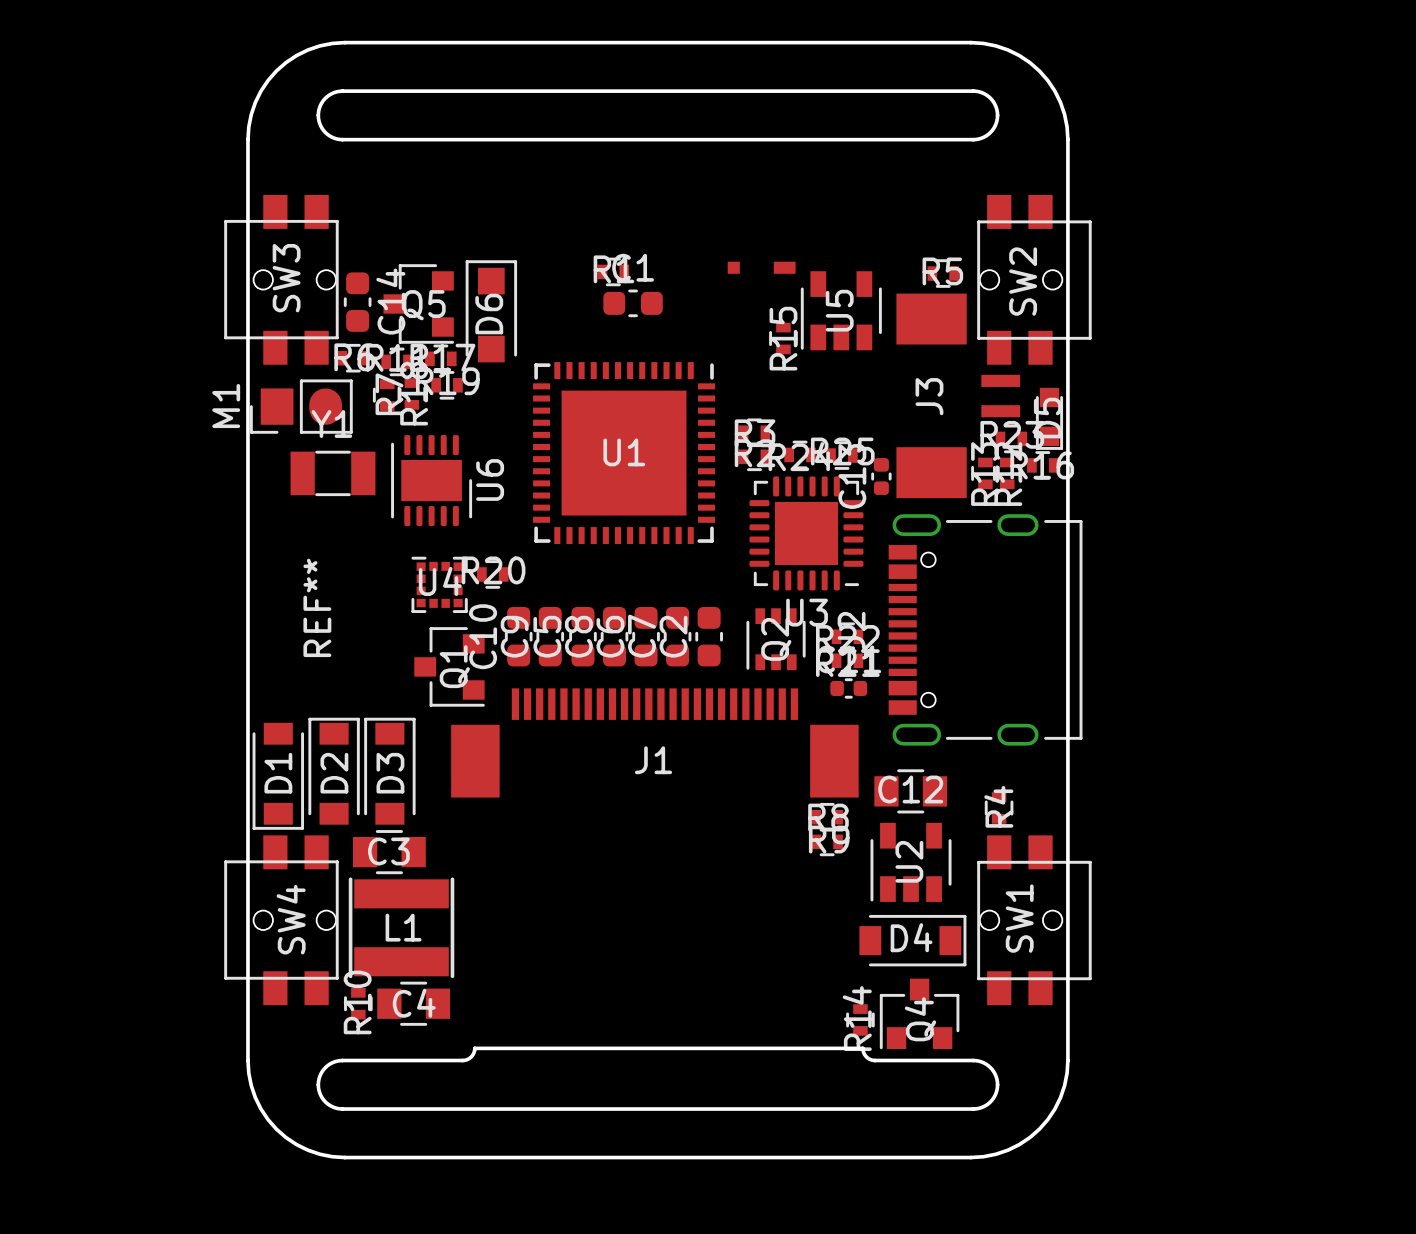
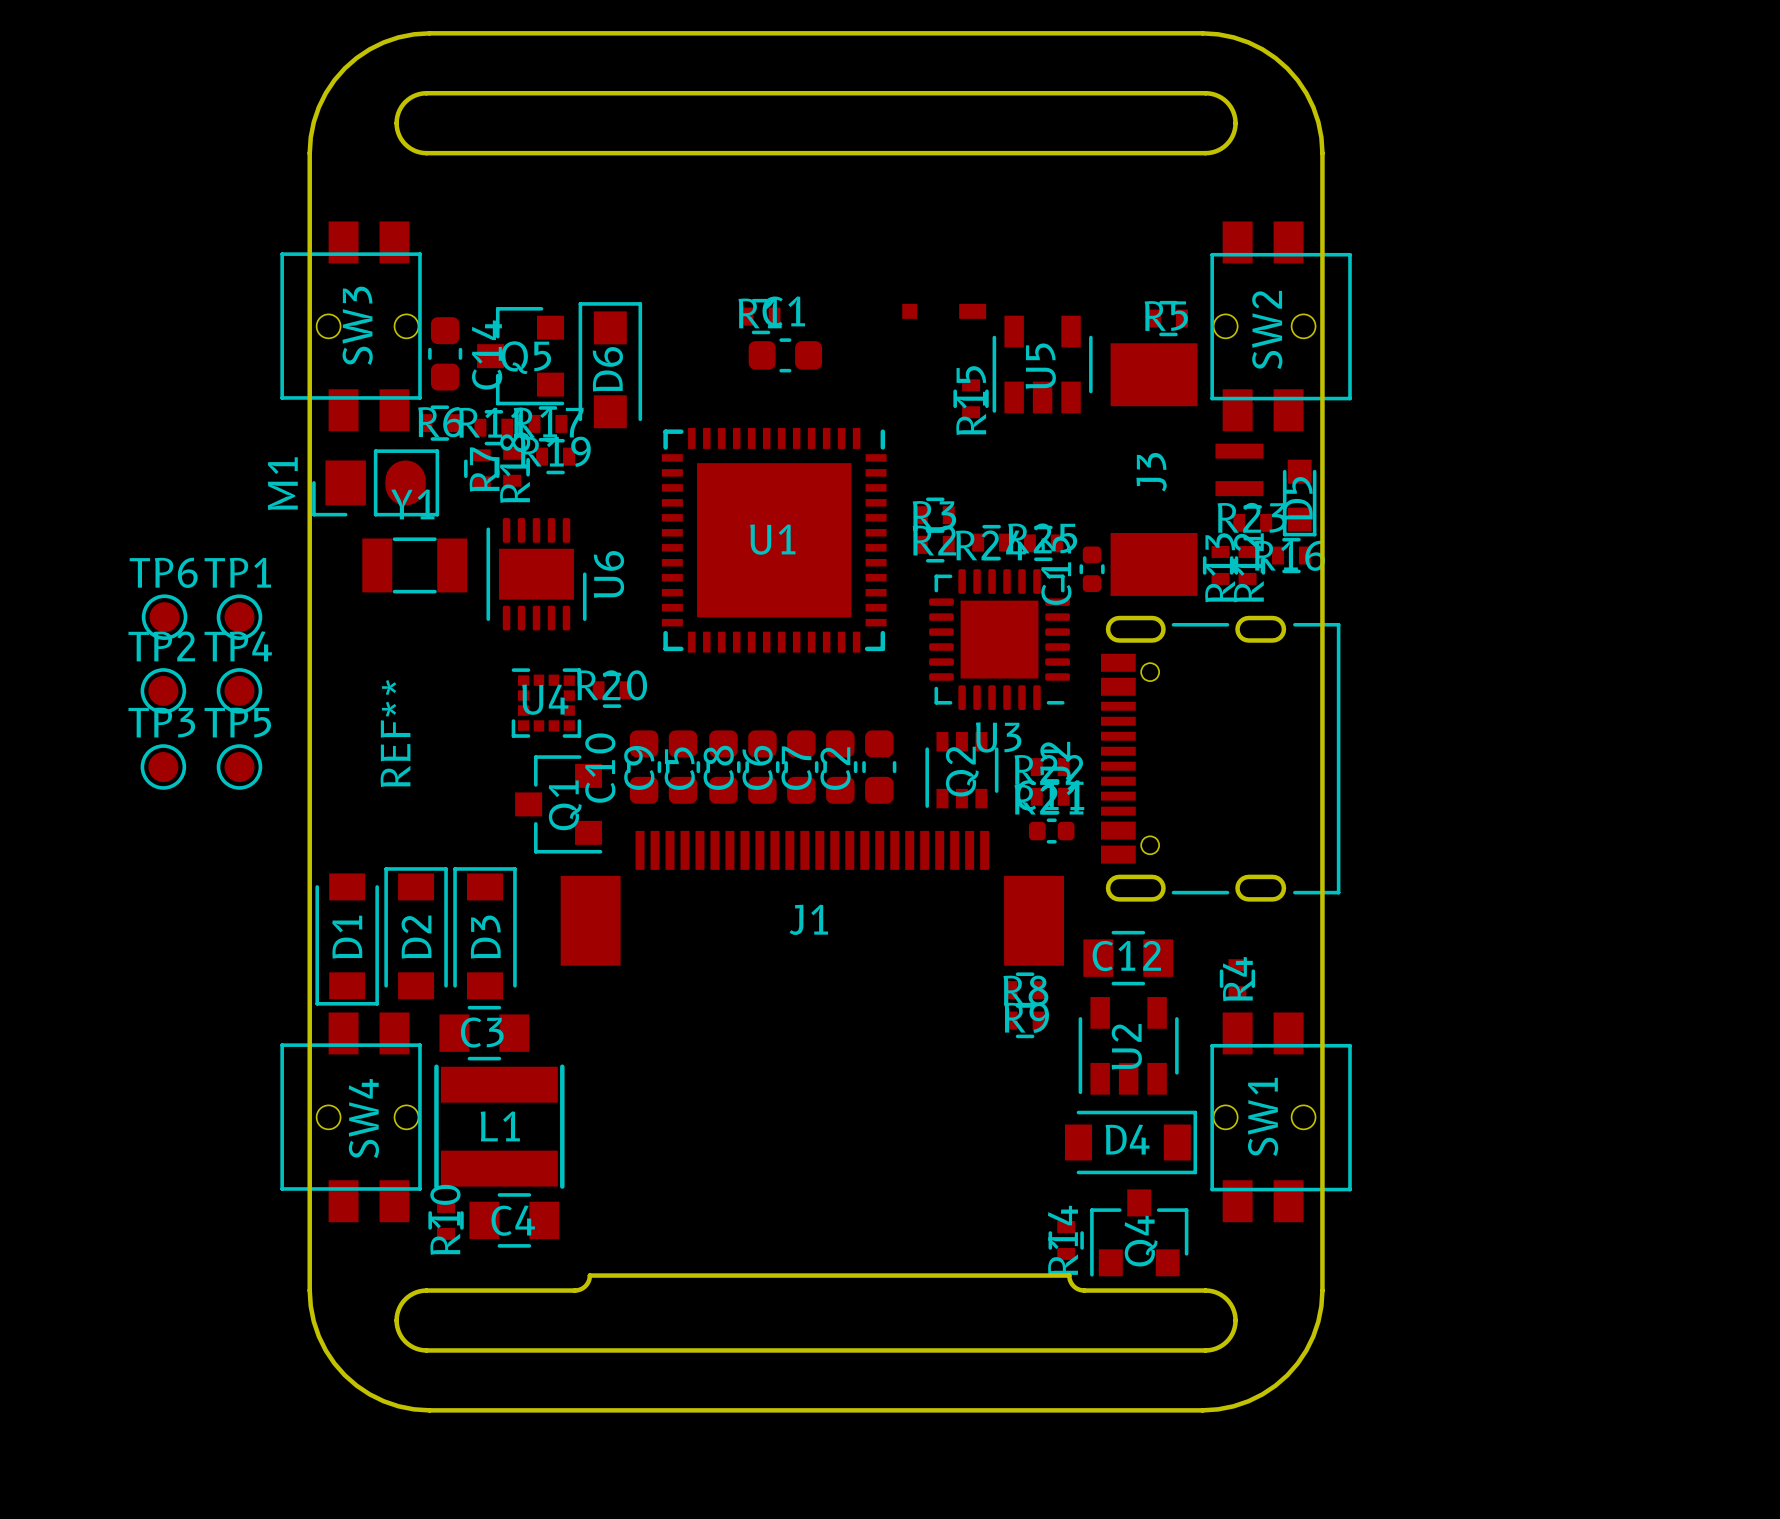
TP6: none -> (164, 617)
TP1: none -> (239, 617)
TP2: none -> (163, 690)
TP4: none -> (239, 690)
TP3: none -> (163, 766)
TP5: none -> (239, 766)

